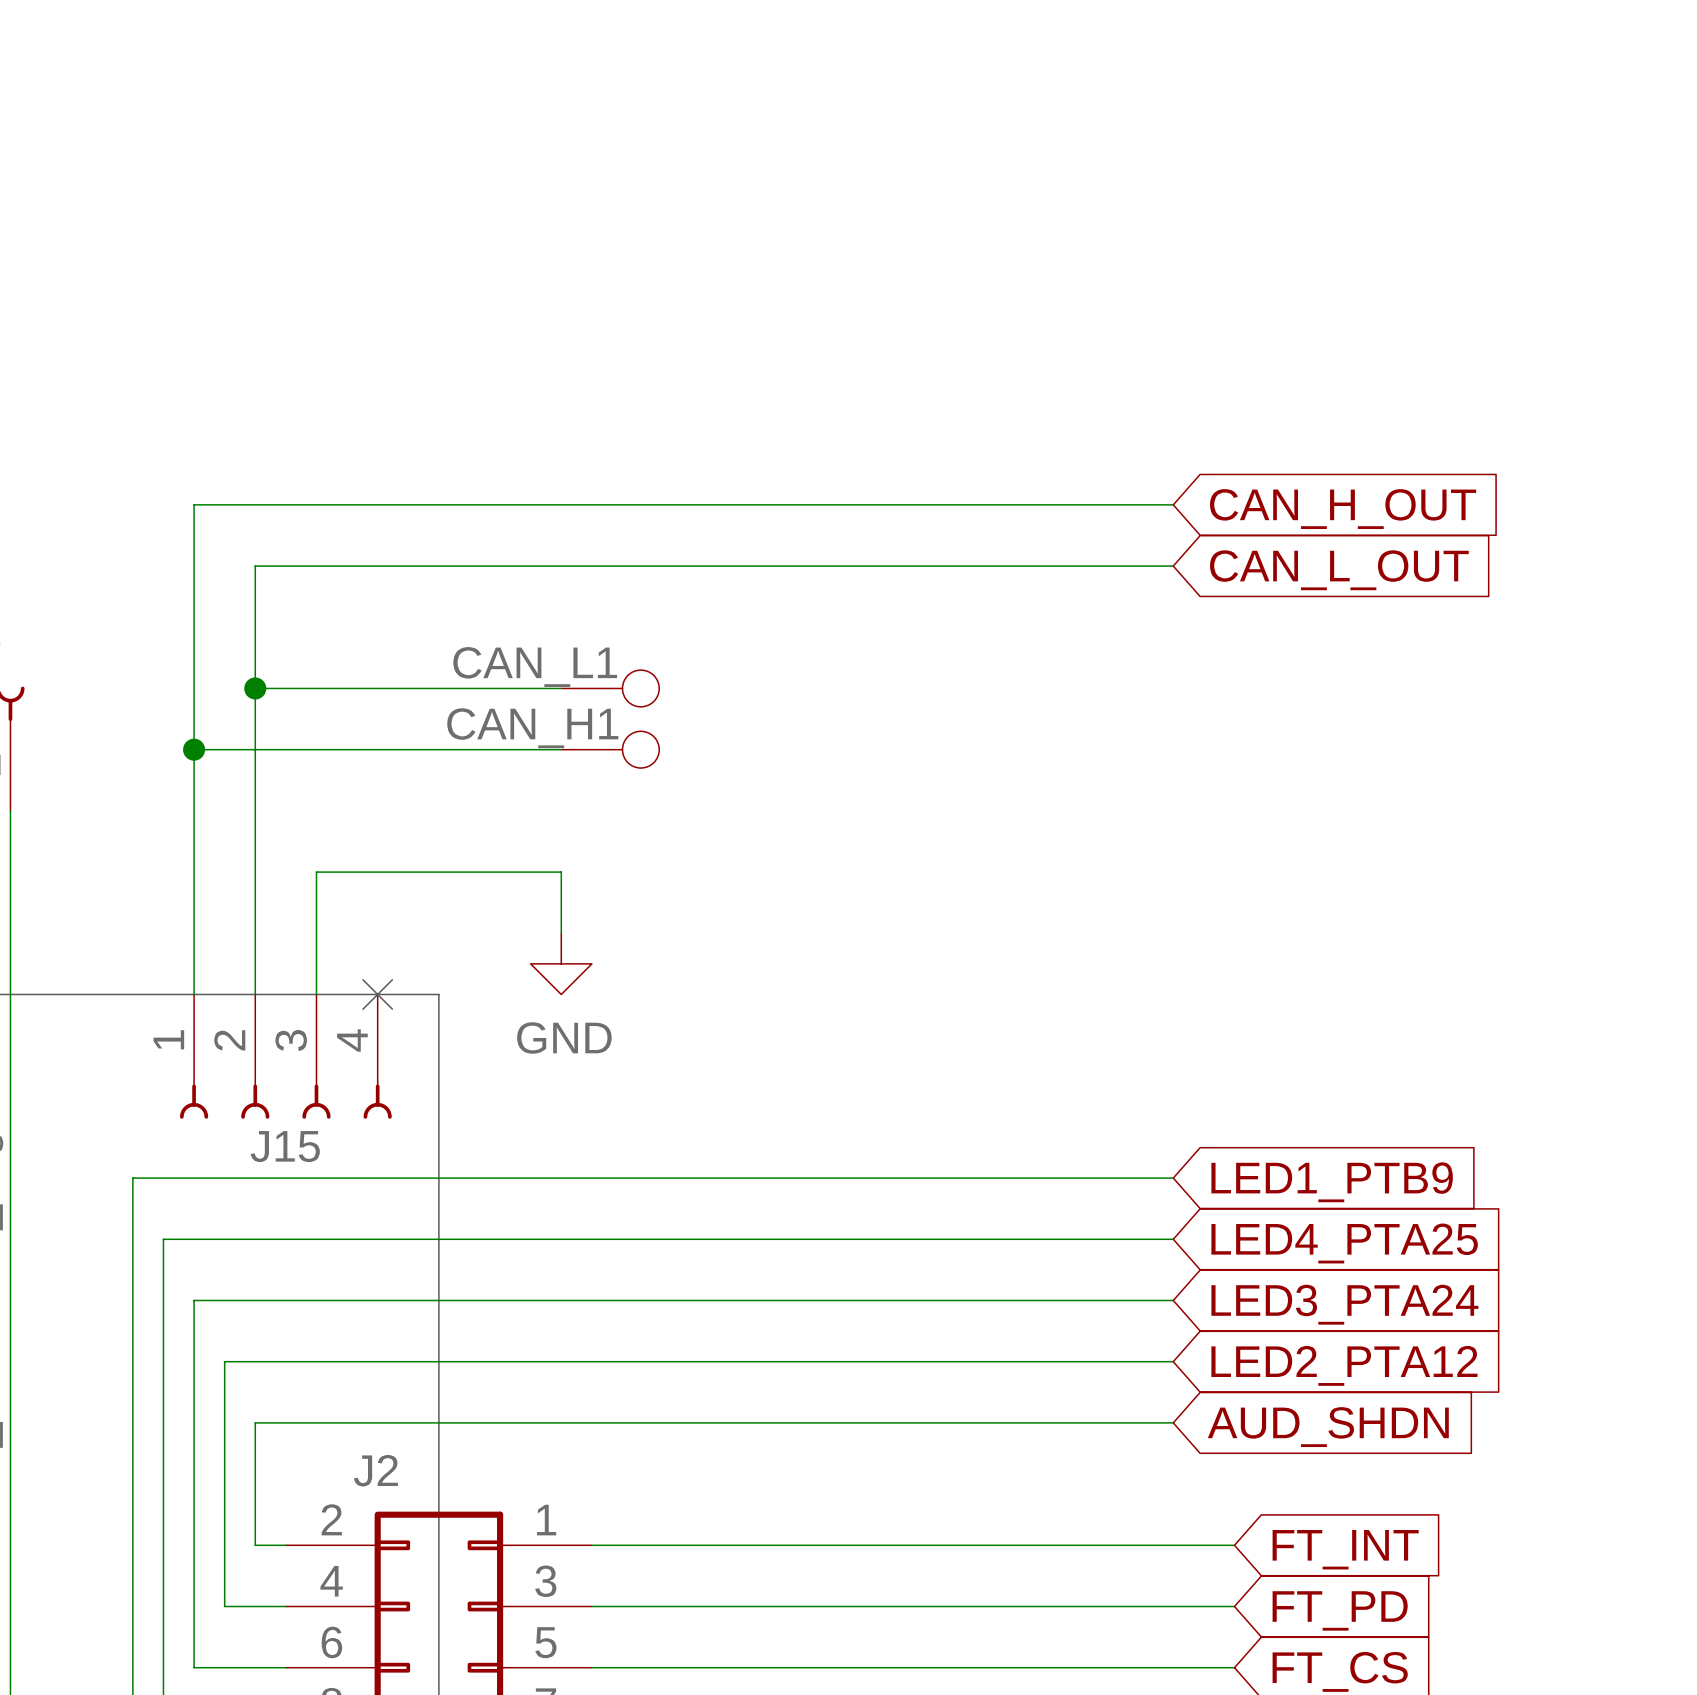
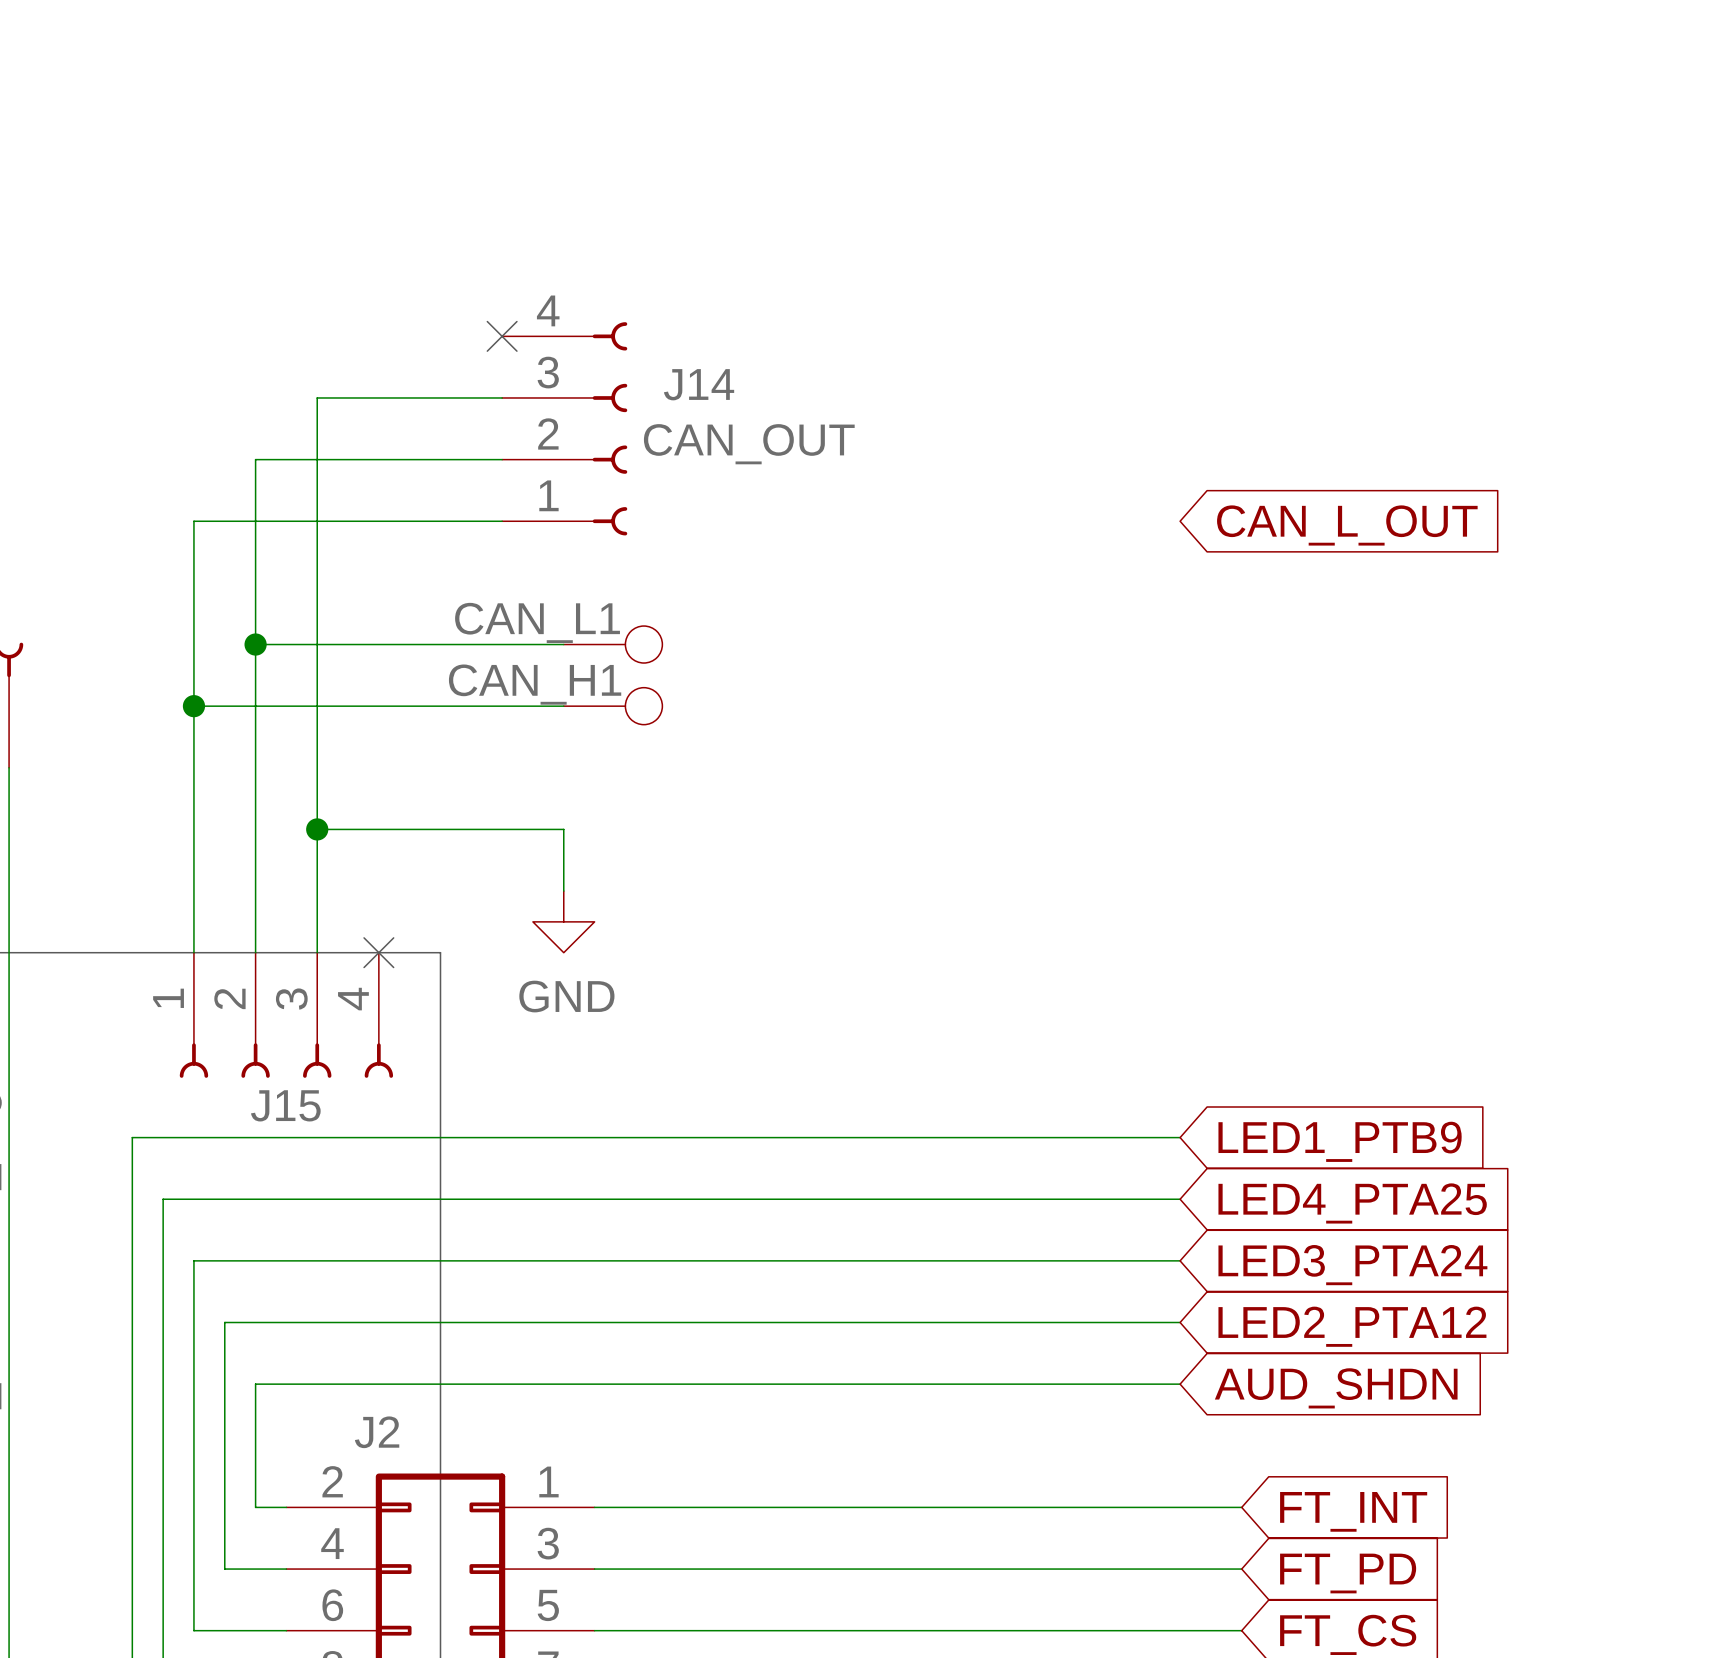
no-connect mark: none -> (502, 336)
wire: none -> (502, 397) (317, 397) (317, 829)
J14: none -> CAN_OUT (564, 428)
wire: (255, 504) (194, 504) (194, 566) -> (255, 459) (255, 521) (193, 521)
wire: (500, 504) (1173, 504) -> none
global label: CAN_H_OUT (1343, 509) -> none
wire: (500, 566) (1173, 566) -> none
junction: none -> (317, 829)

